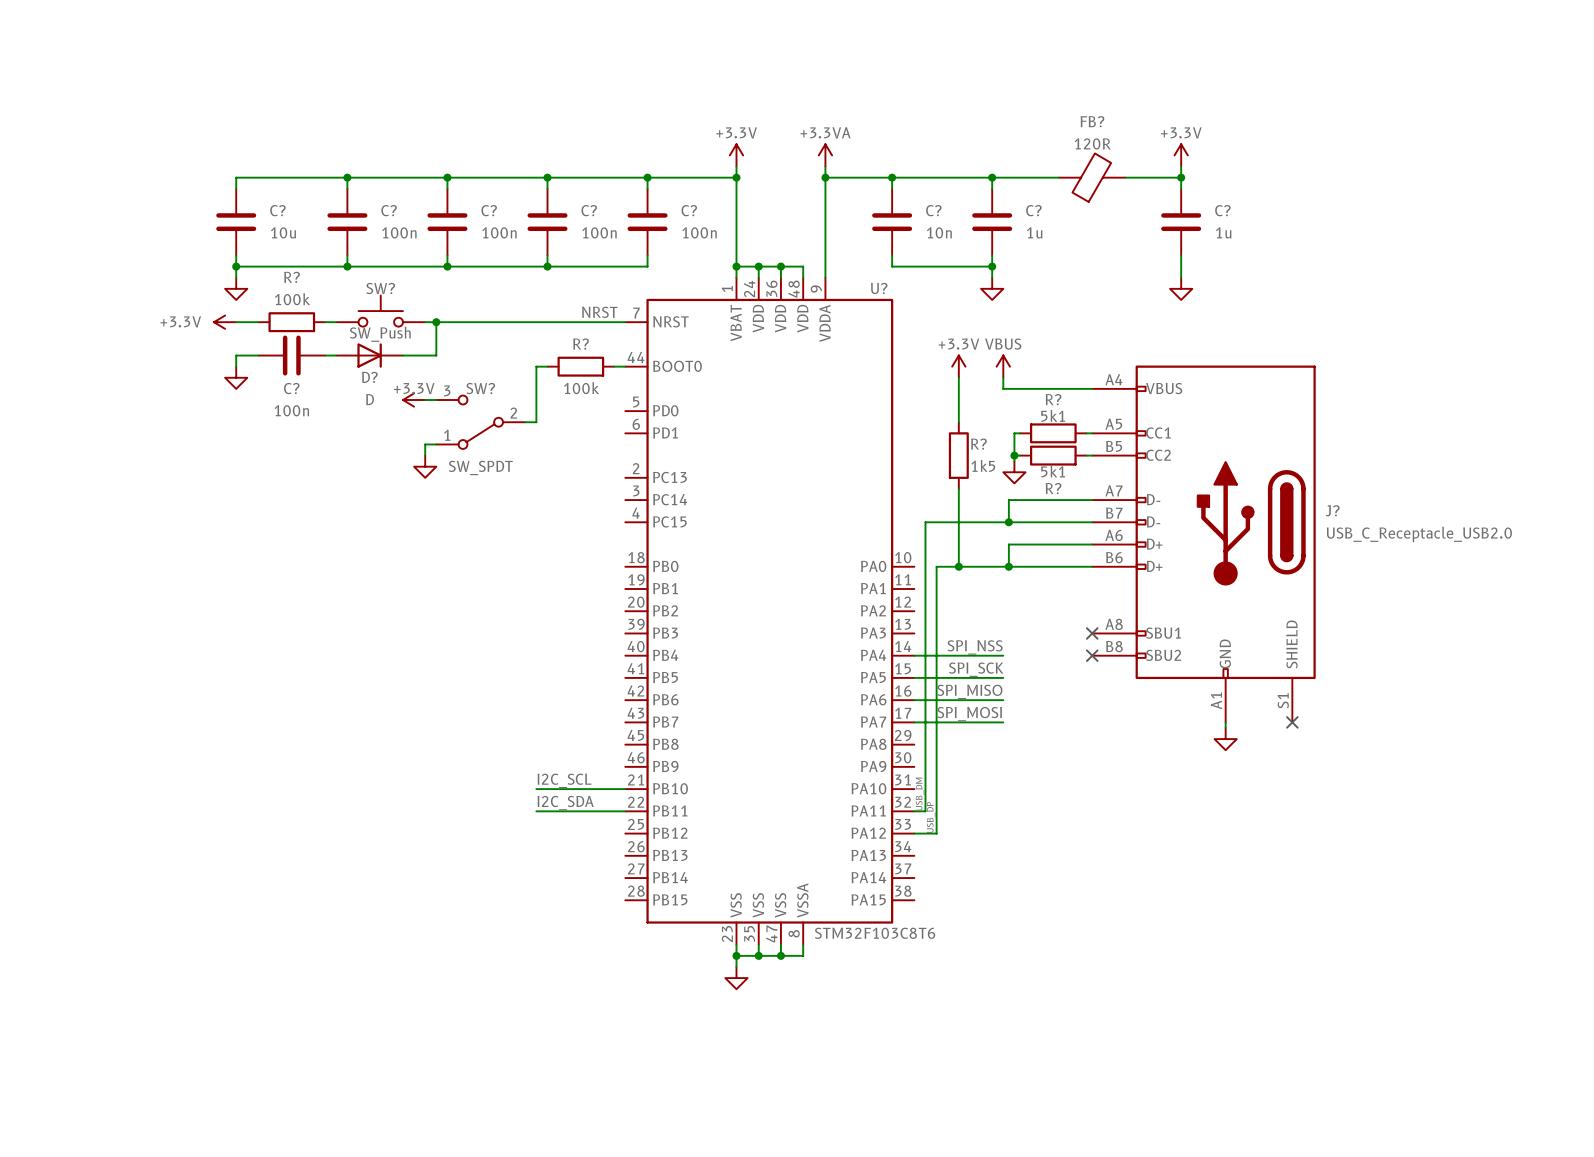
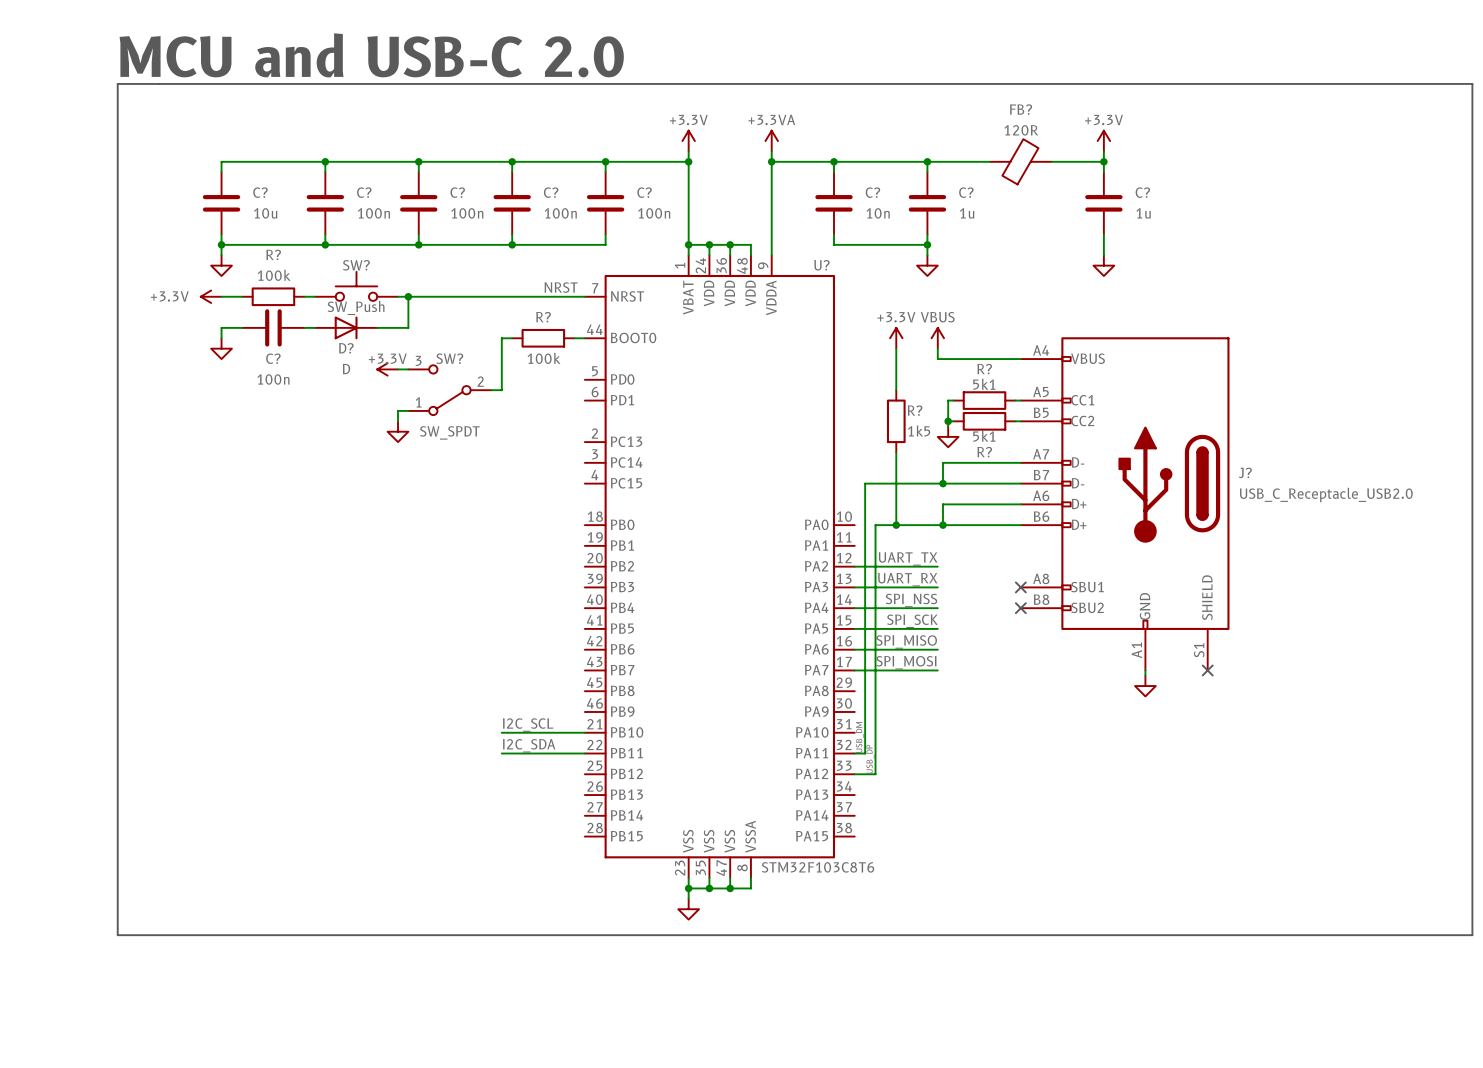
text: none -> MCU and USB-C 2.0 (371, 55)
line: none -> (117, 83) (1472, 83) (1472, 935) (117, 935) (117, 83)
label: none -> UART_TX (908, 558)
wire: none -> (854, 566) (937, 566)
label: none -> UART_RX (907, 579)
wire: none -> (854, 587) (937, 587)

